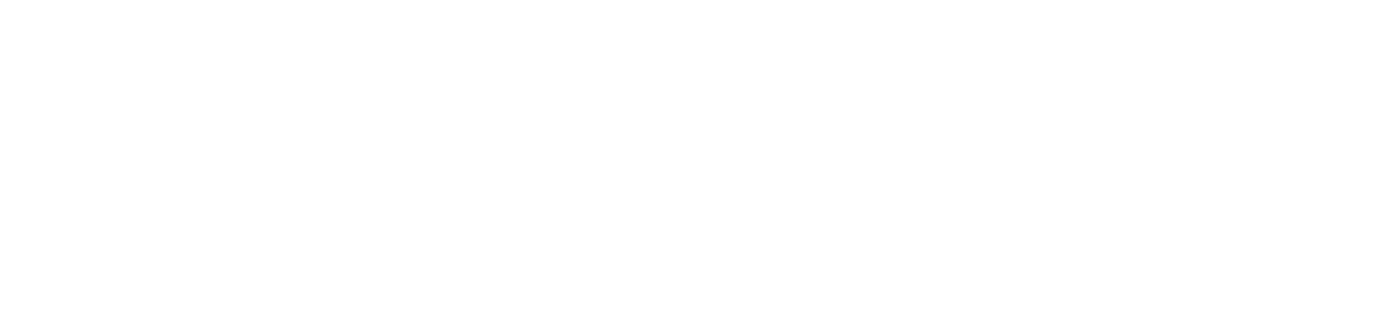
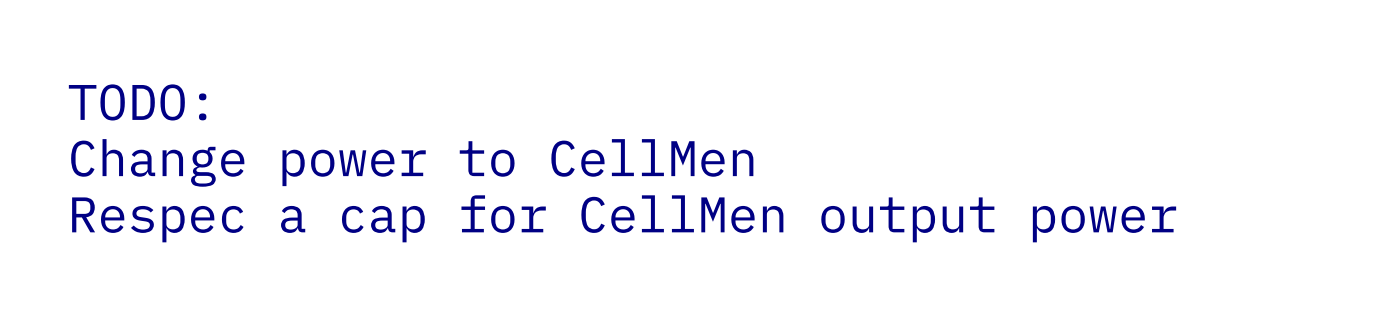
text: none -> TODO: (137, 102)
text: none -> Change power to CellMen (412, 162)
text: none -> Respec a cap for CellMen output power (624, 218)

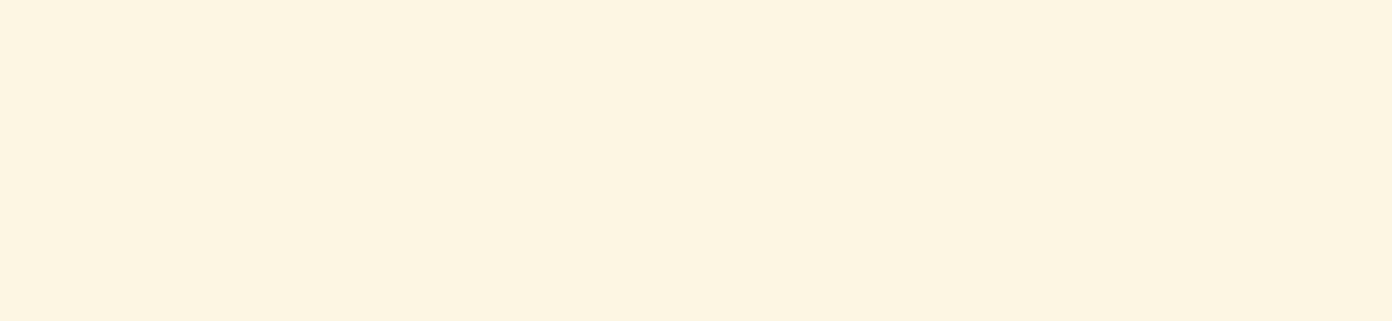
text: TODO: (137, 102) -> none
text: Change power to CellMen (412, 162) -> none
text: Respec a cap for CellMen output power (624, 218) -> none

